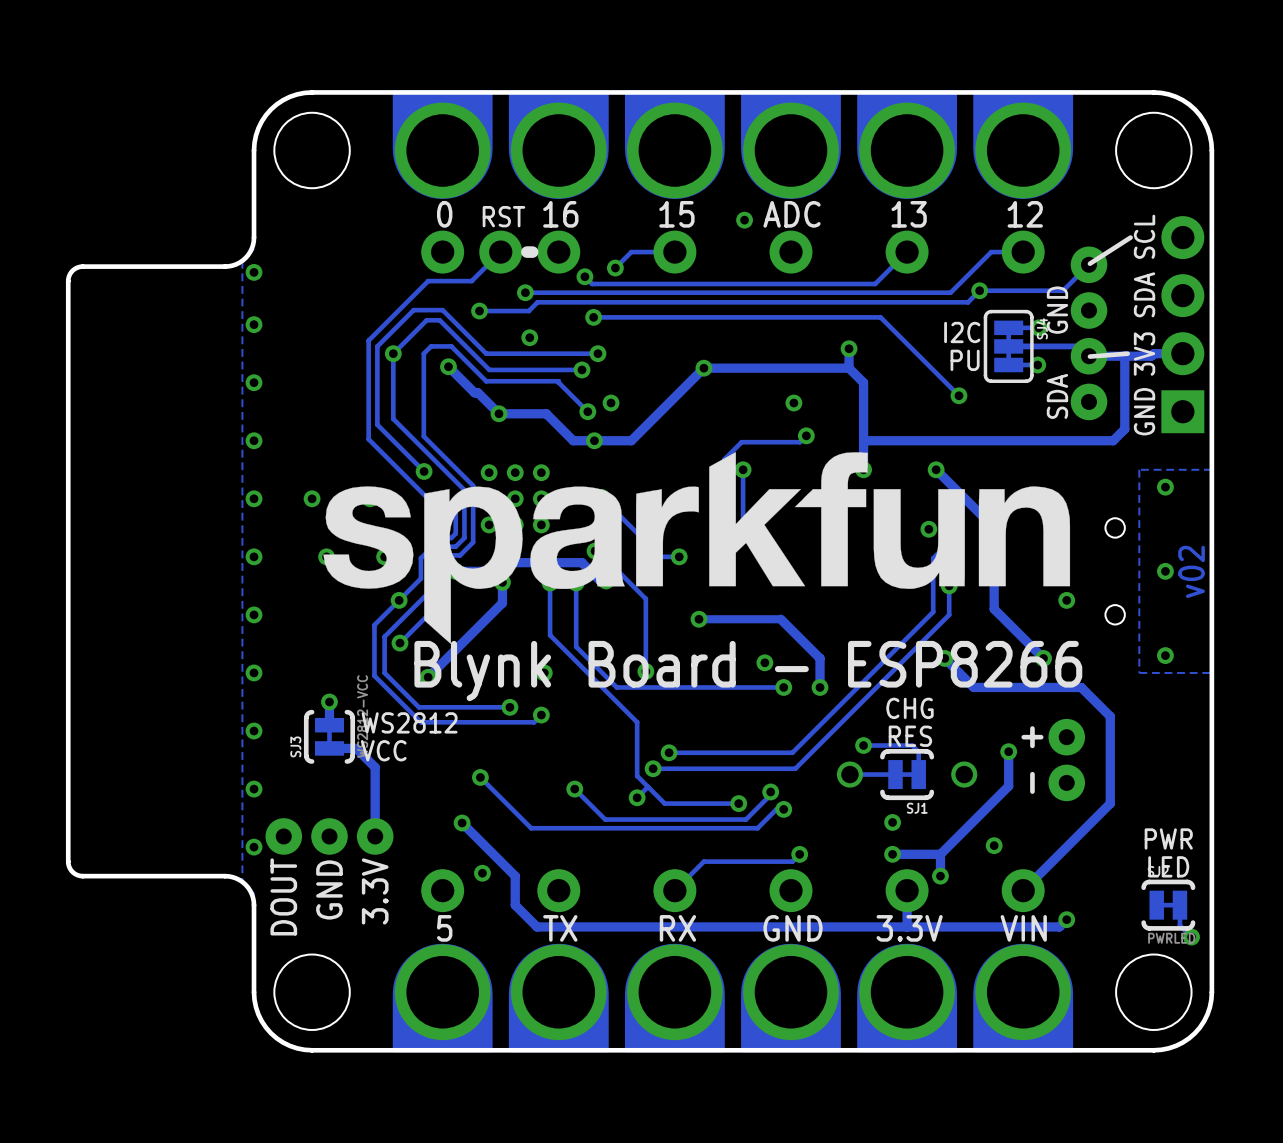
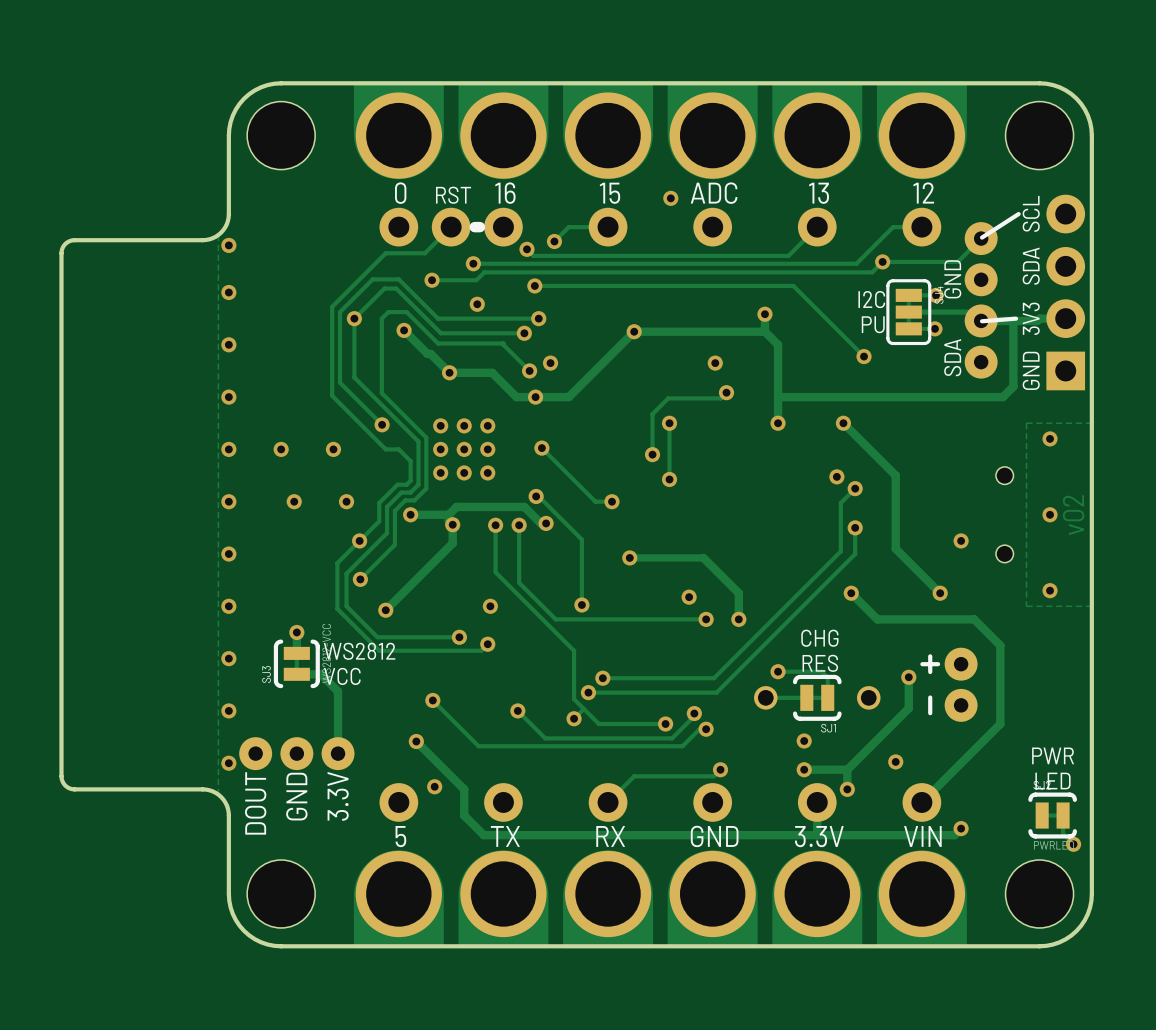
drawing: [323, 452, 1071, 645] -> none
text: Blynk Board - ESP8266 (748, 671) -> none

